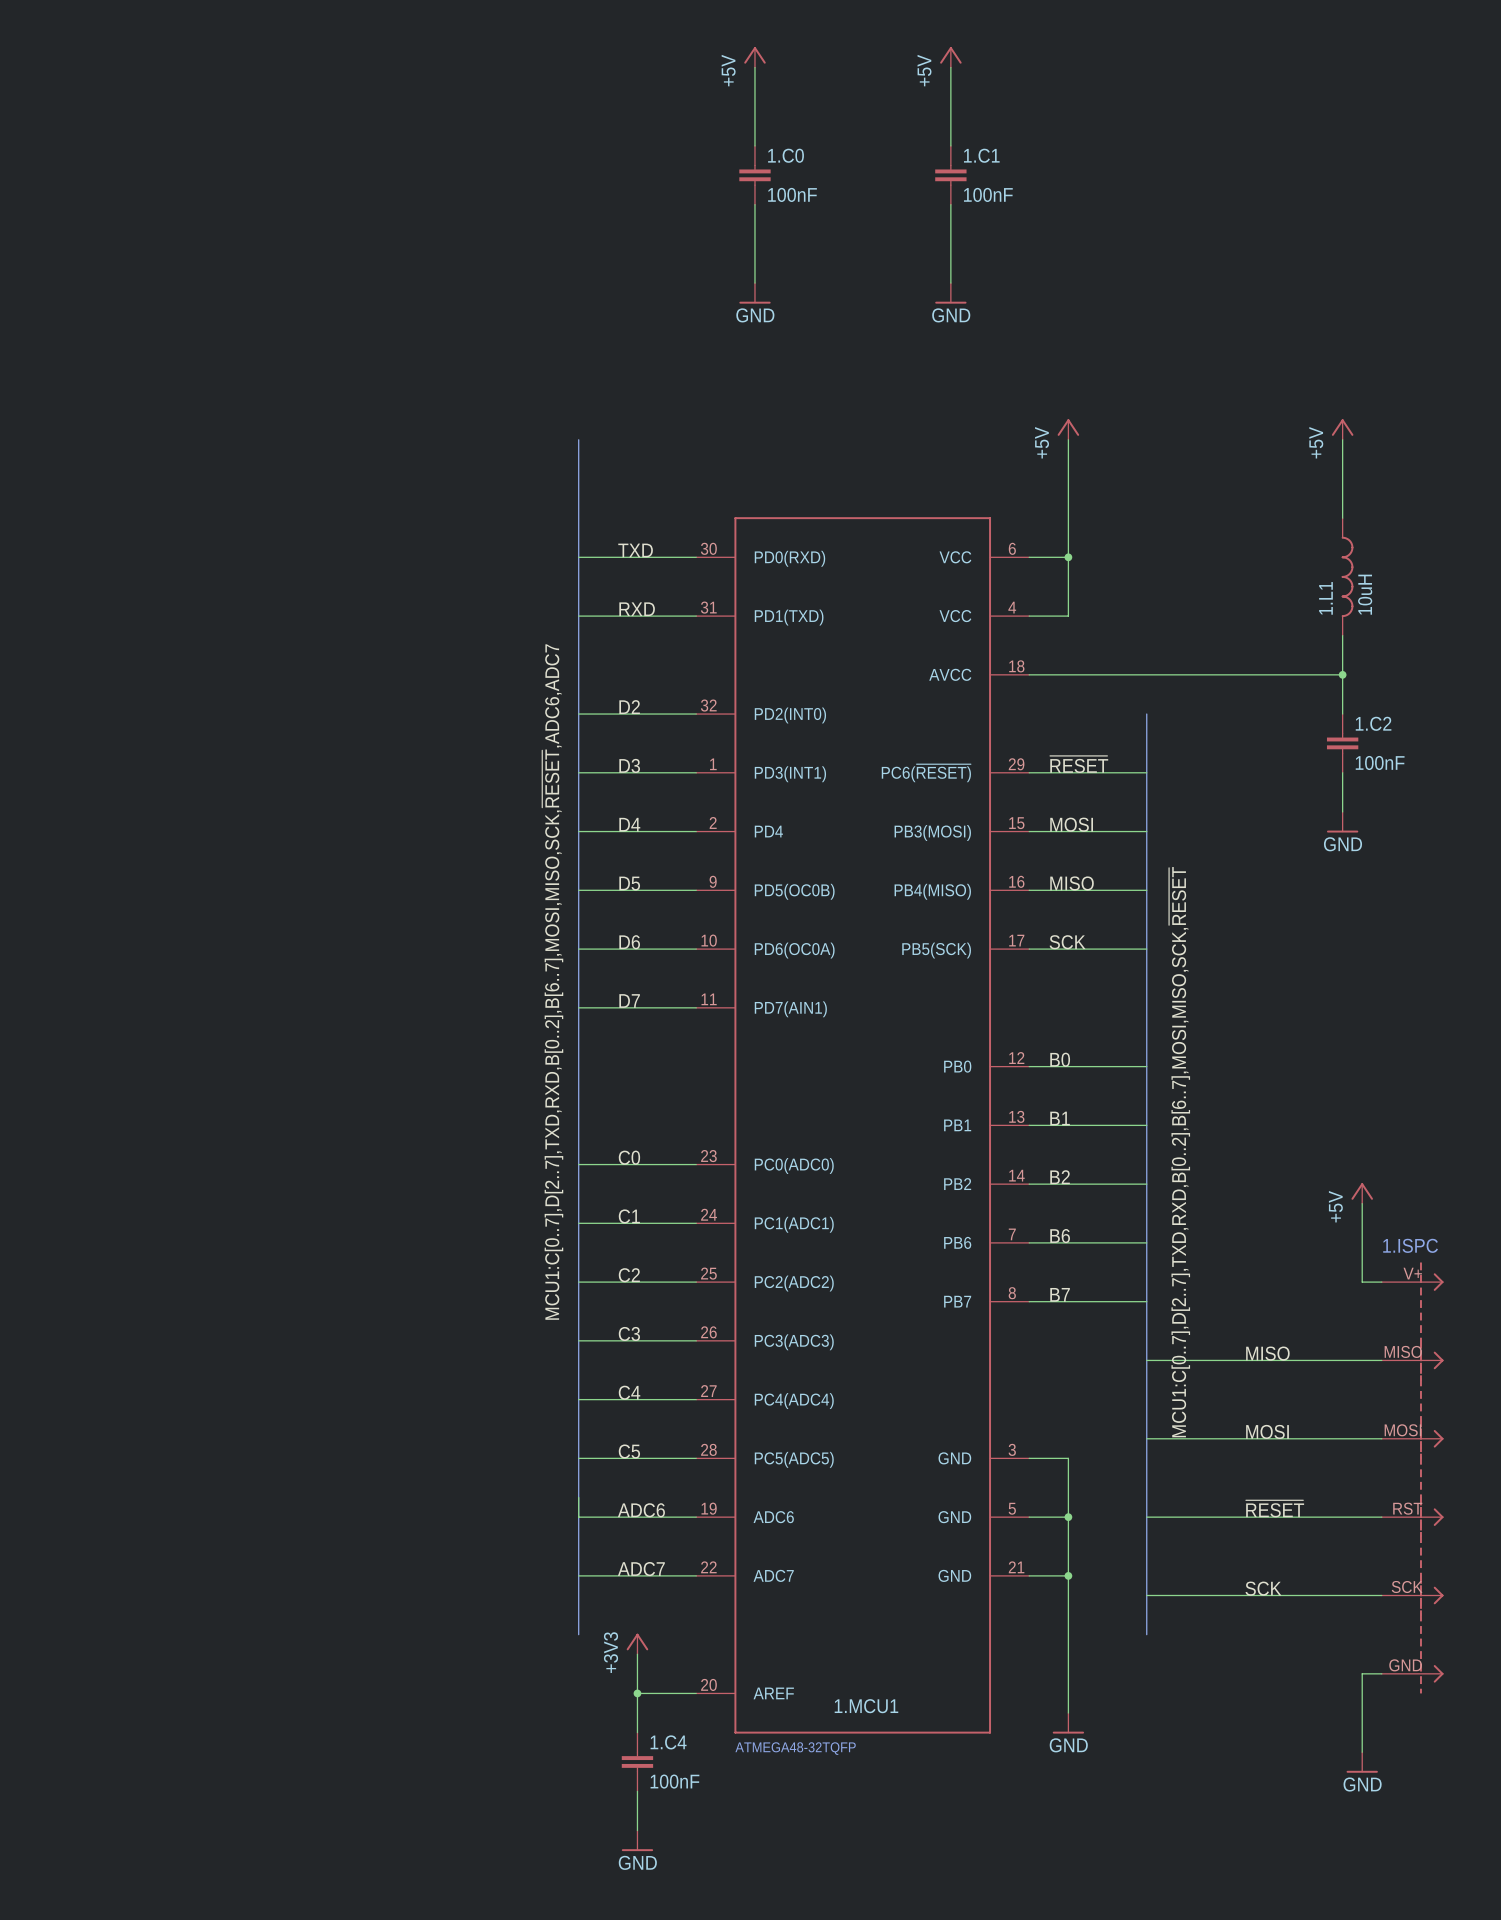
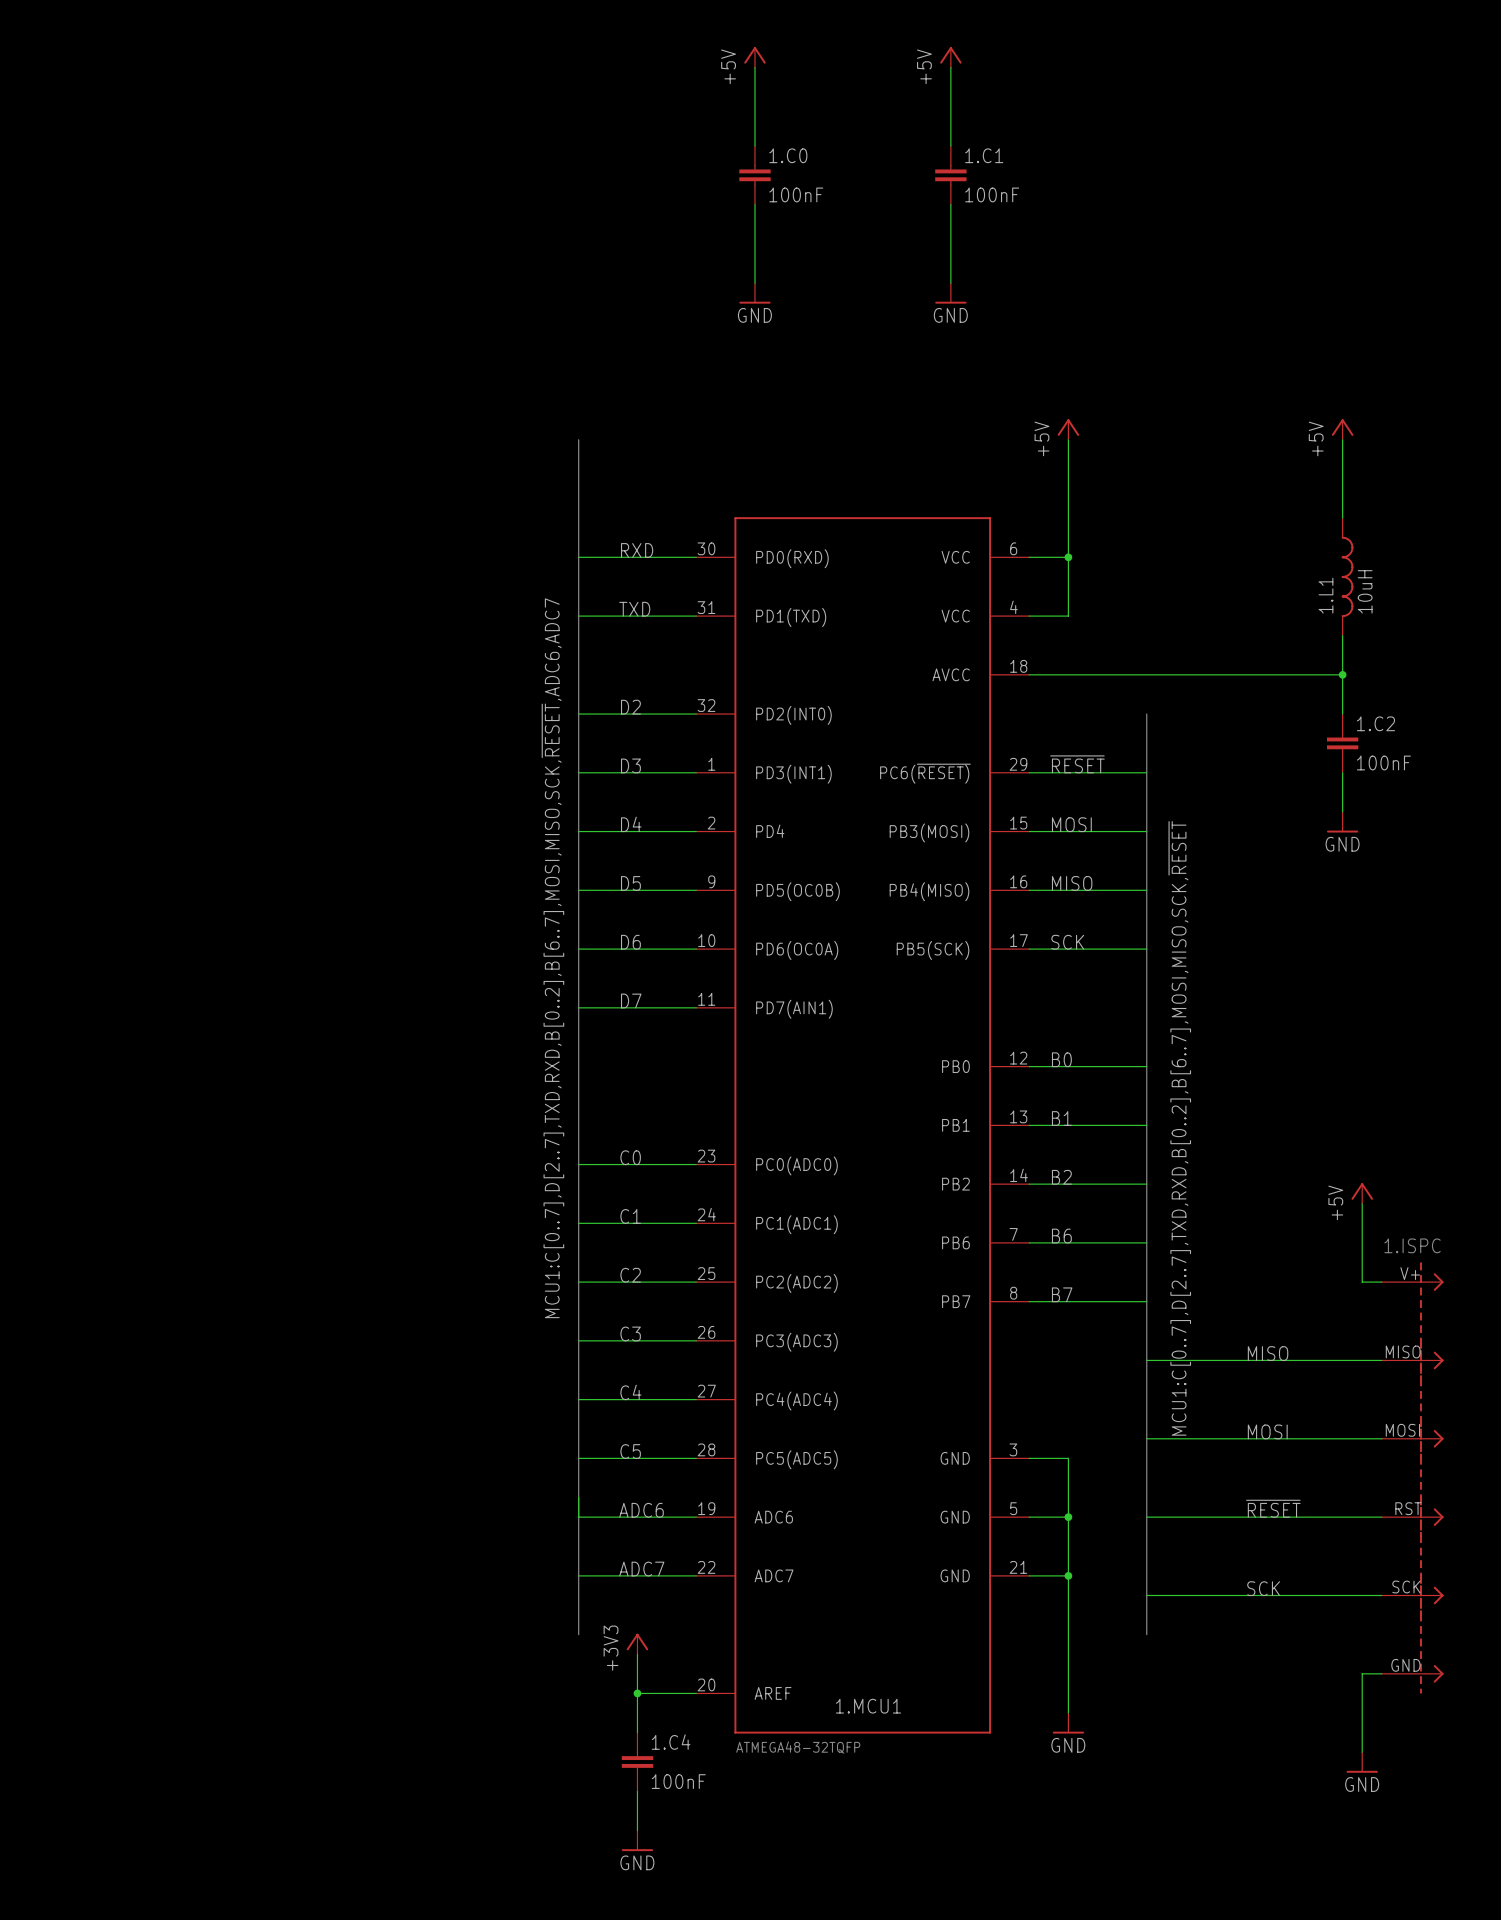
label: TXD (635, 550) -> RXD (637, 550)
label: RXD (637, 609) -> TXD (634, 609)

